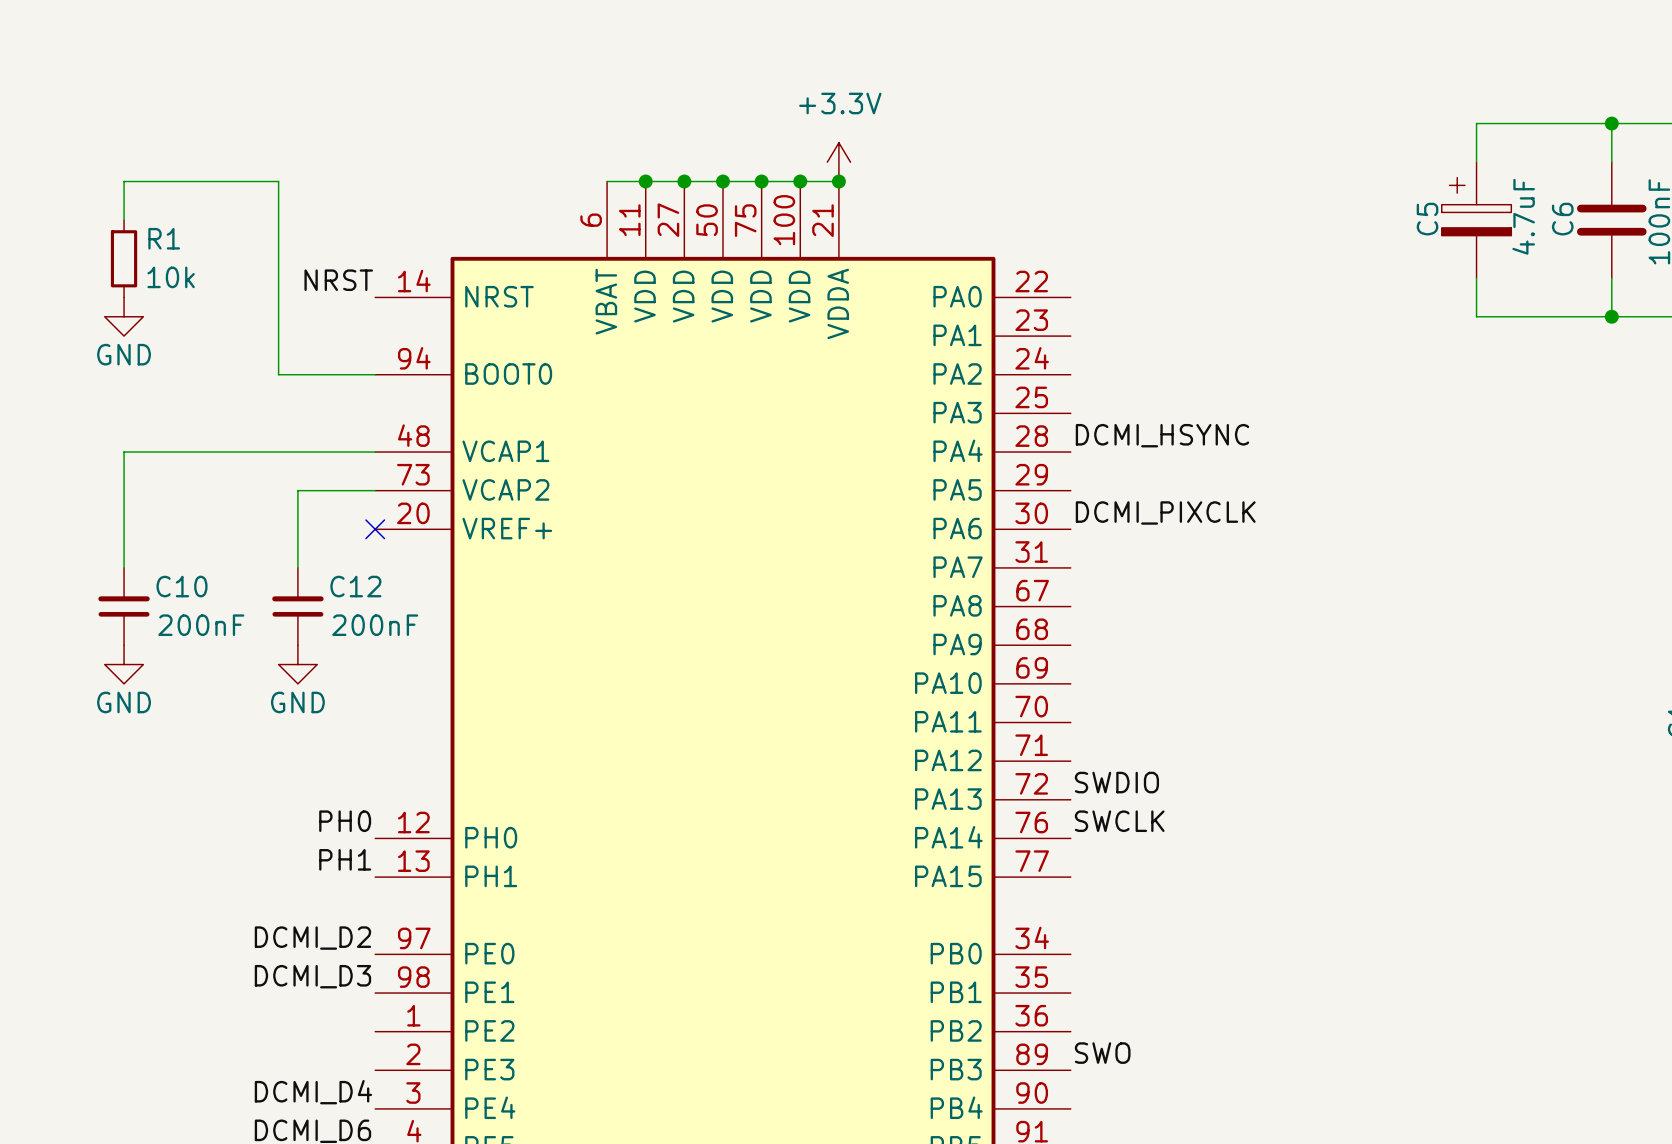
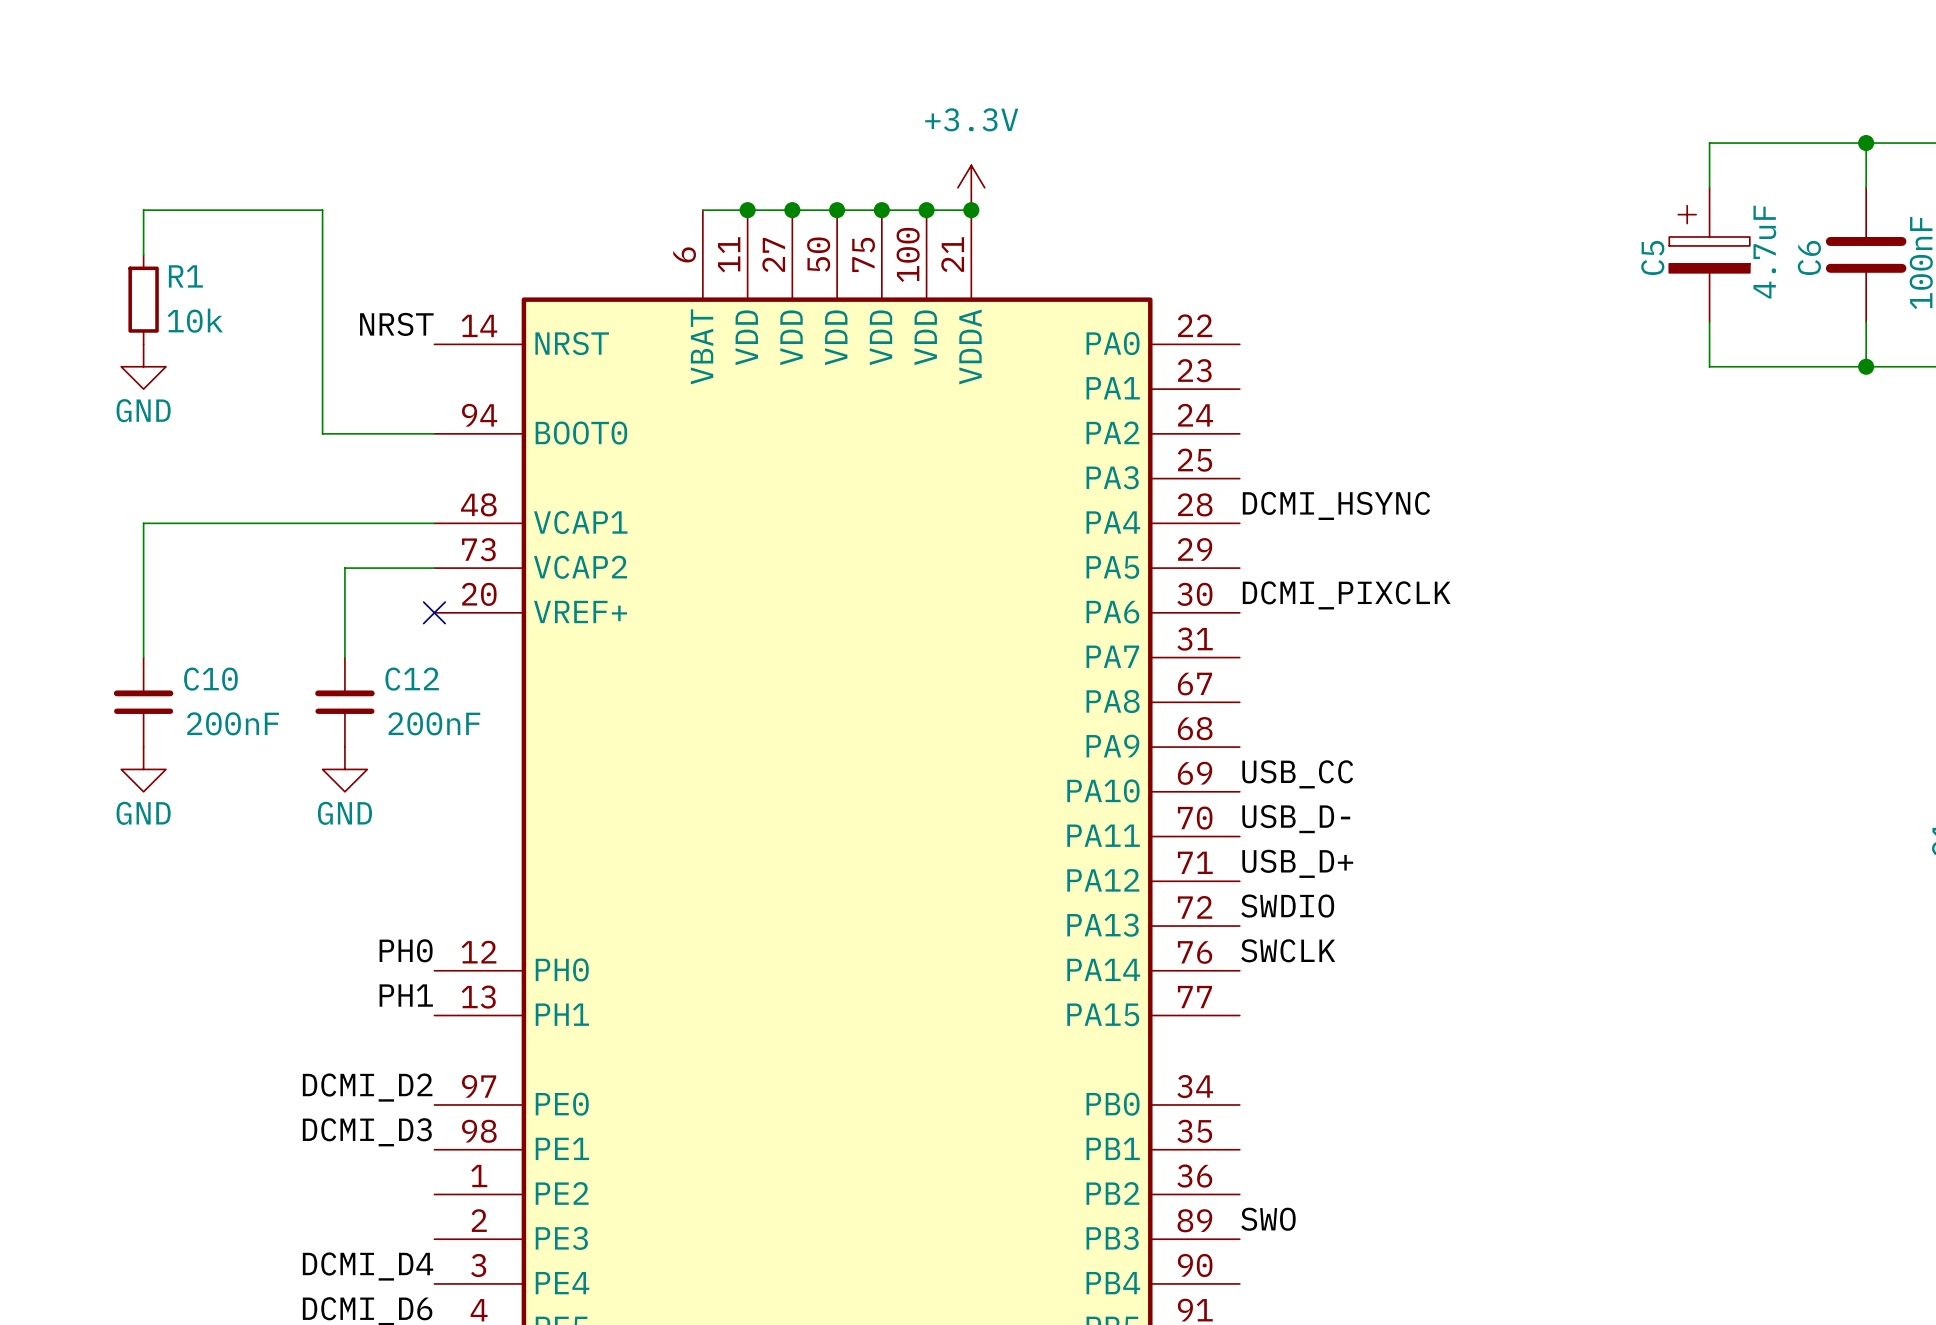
label: none -> USB_CC (1297, 774)
label: none -> USB_D- (1296, 819)
label: none -> USB_D+ (1297, 863)

